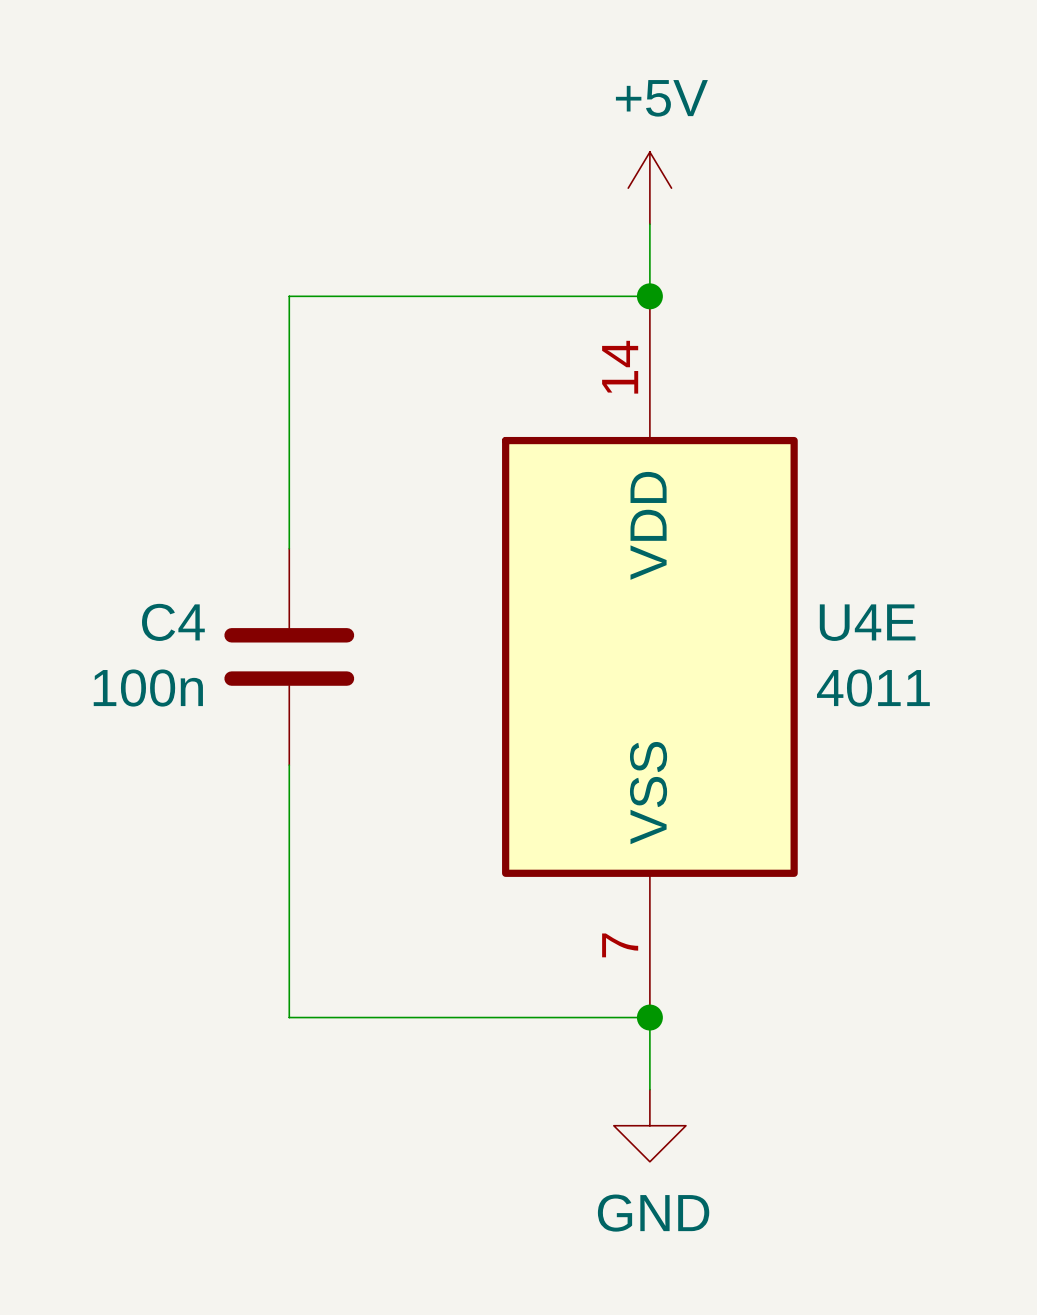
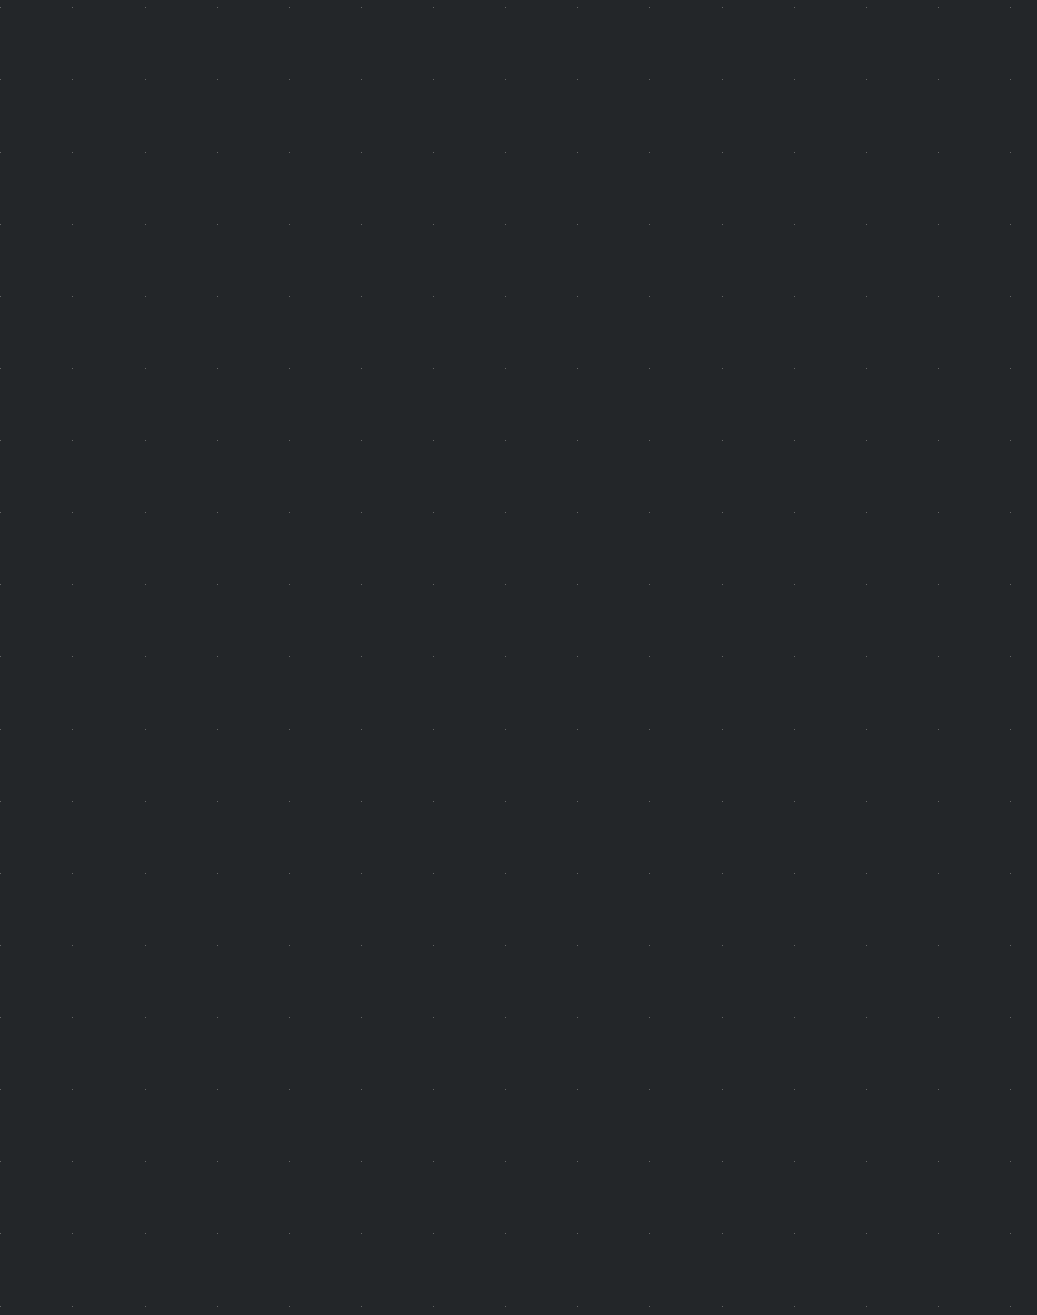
power symbol: +5V (649, 188) -> none
wire: (649, 224) (649, 296) (289, 296) (289, 548) -> none
junction: (649, 296) -> none
C4: 100n (289, 656) -> none
U4E: 4011 (649, 656) -> none
wire: (289, 765) (289, 1017) (649, 1017) (649, 1089) -> none
junction: (649, 1017) -> none
power symbol: GND (649, 1125) -> none

